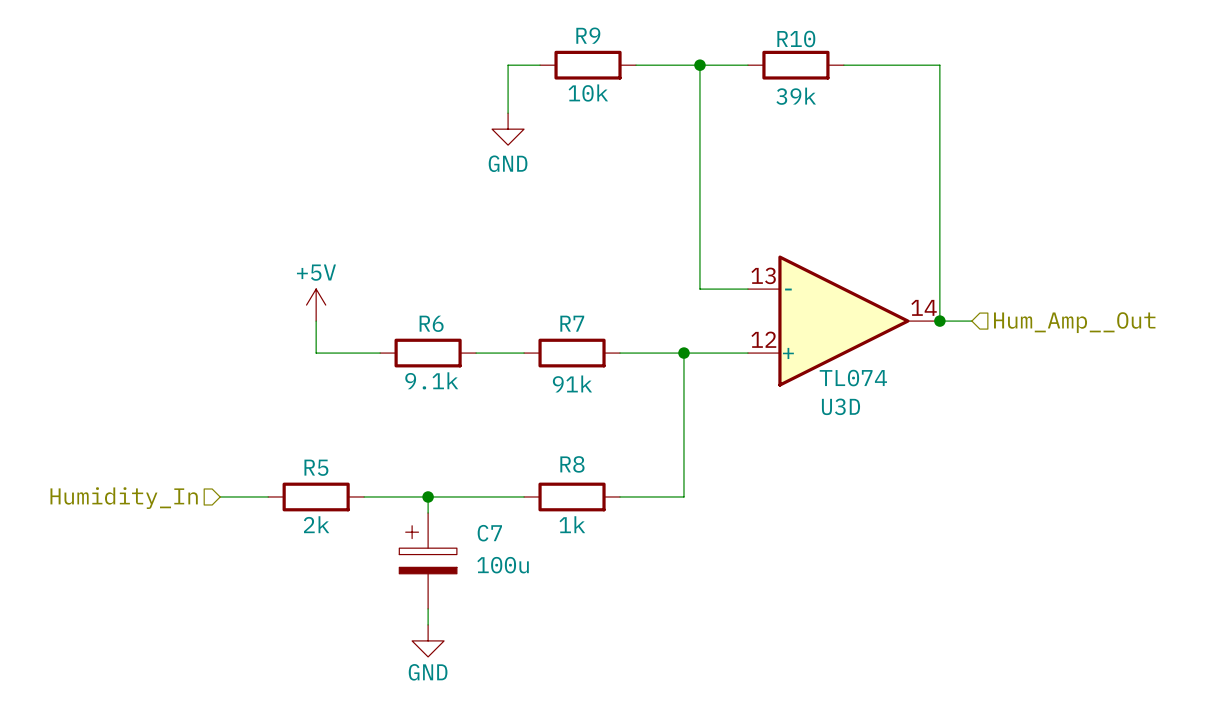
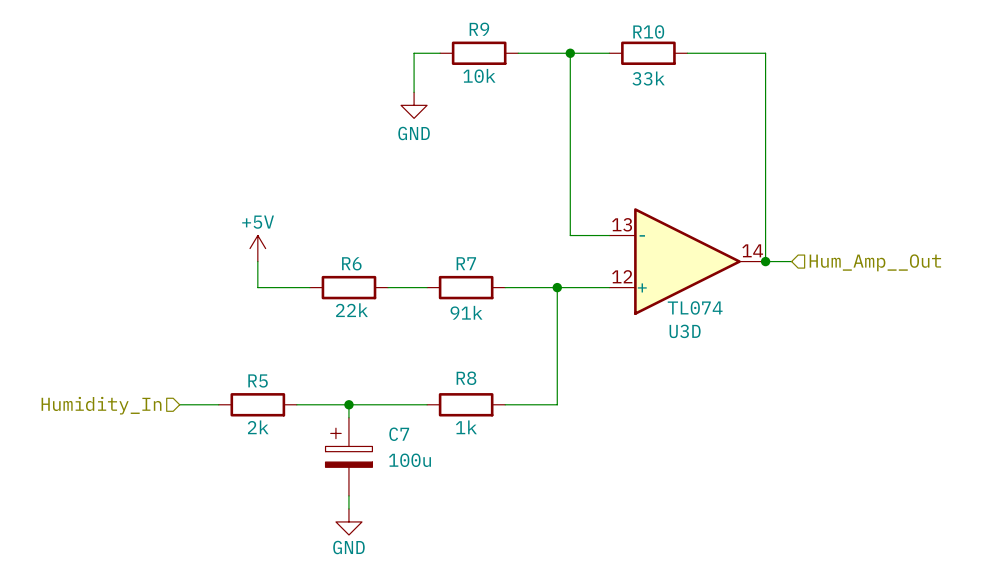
R10 value: 39k (796, 96) -> 33k (648, 78)
R6 value: 9.1k (431, 380) -> 22k (351, 310)

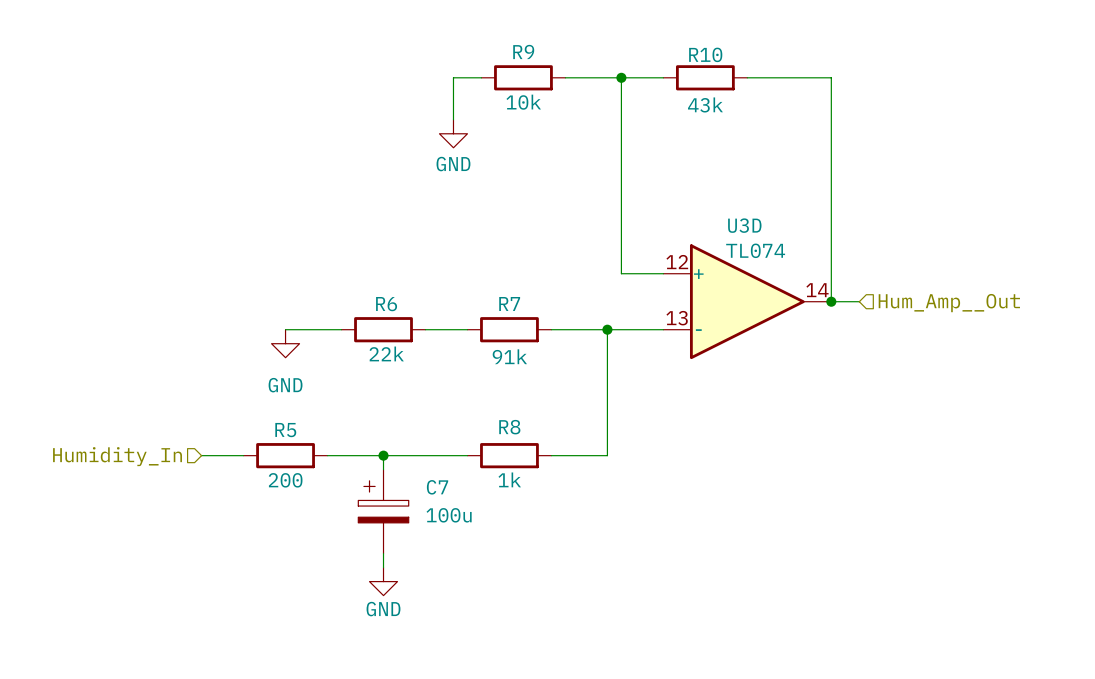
R10 value: 33k (648, 78) -> 43k (705, 104)
power symbol: +5V (257, 248) -> none
wire: (257, 261) (257, 287) -> none
U3D flip: as is (687, 261) -> up-down (747, 301)
power symbol: none -> GND (285, 343)
R5 value: 2k (258, 427) -> 200 (285, 480)

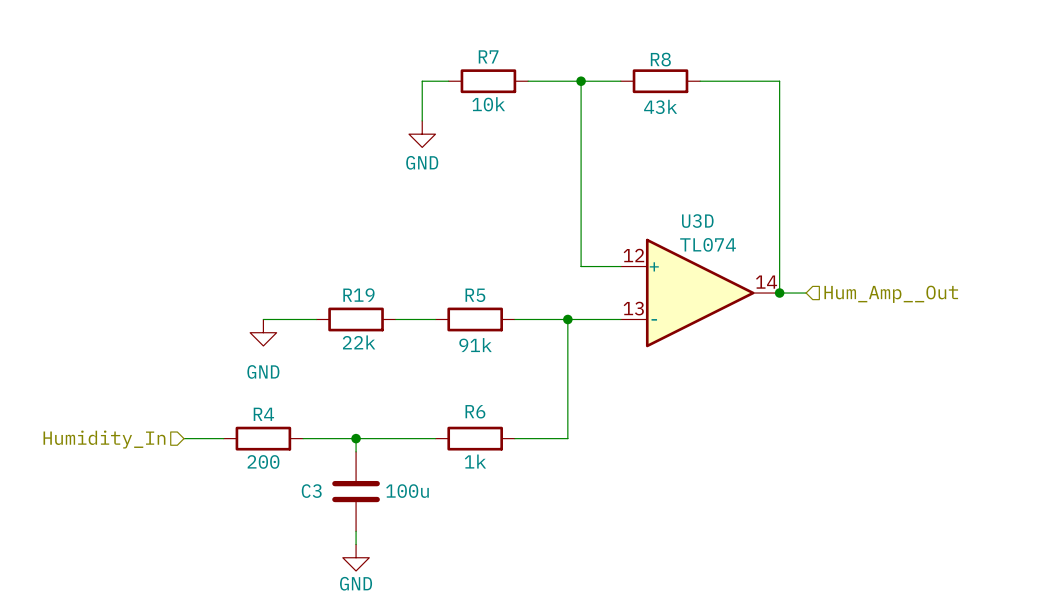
R9 name: R9 (523, 51) -> R7 (488, 56)
R10 name: R10 (705, 54) -> R8 (660, 59)
R7 name: R7 (509, 303) -> R5 (475, 295)
R6 name: R6 (386, 304) -> R19 (358, 295)
R8 name: R8 (509, 427) -> R6 (475, 411)
R5 name: R5 (285, 430) -> R4 (263, 414)
C7: 100u (383, 511) -> none
C3: none -> 100u (356, 491)

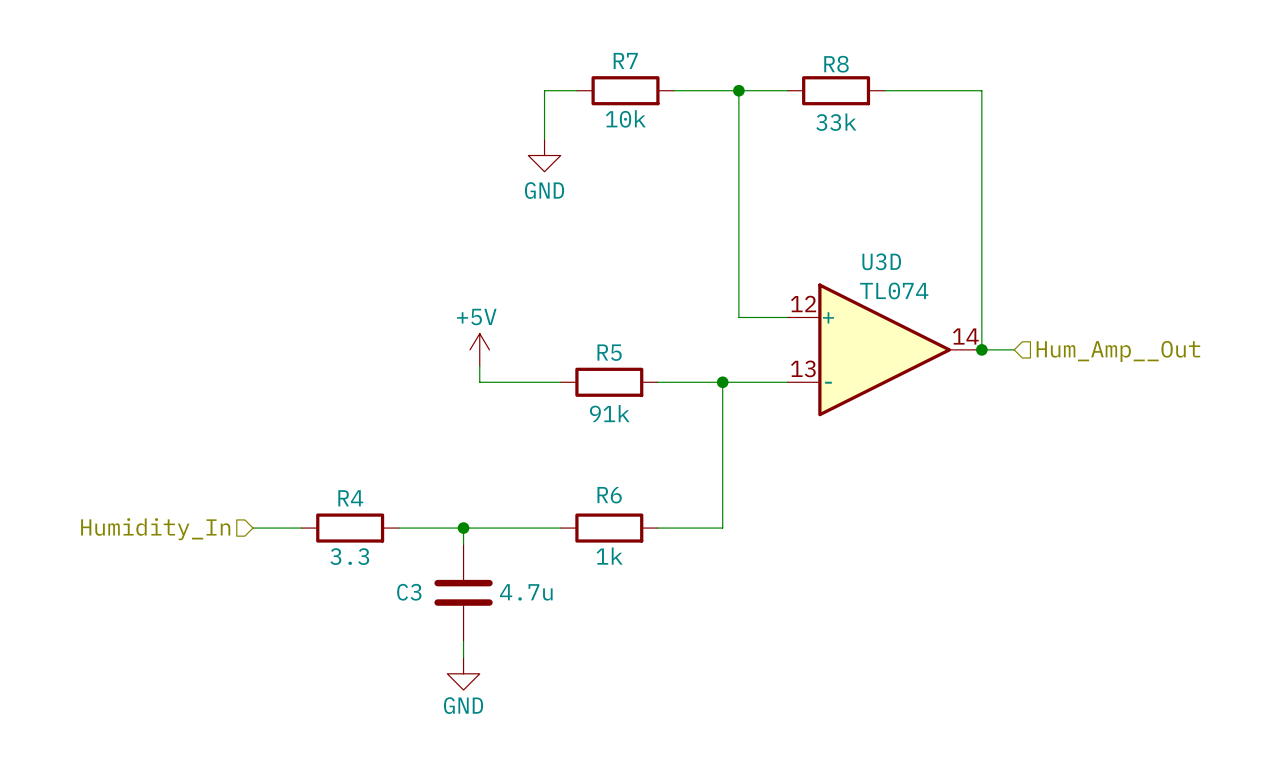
R8 value: 43k (660, 106) -> 33k (836, 122)
power symbol: none -> +5V (479, 349)
wire: none -> (479, 366) (479, 382) (512, 382)
wire: (263, 319) (316, 319) -> none
R19: 22k (356, 319) -> none
power symbol: GND (263, 332) -> none
R4 value: 200 (263, 461) -> 3.3 (349, 556)
C3 value: 100u (407, 491) -> 4.7u (526, 592)

